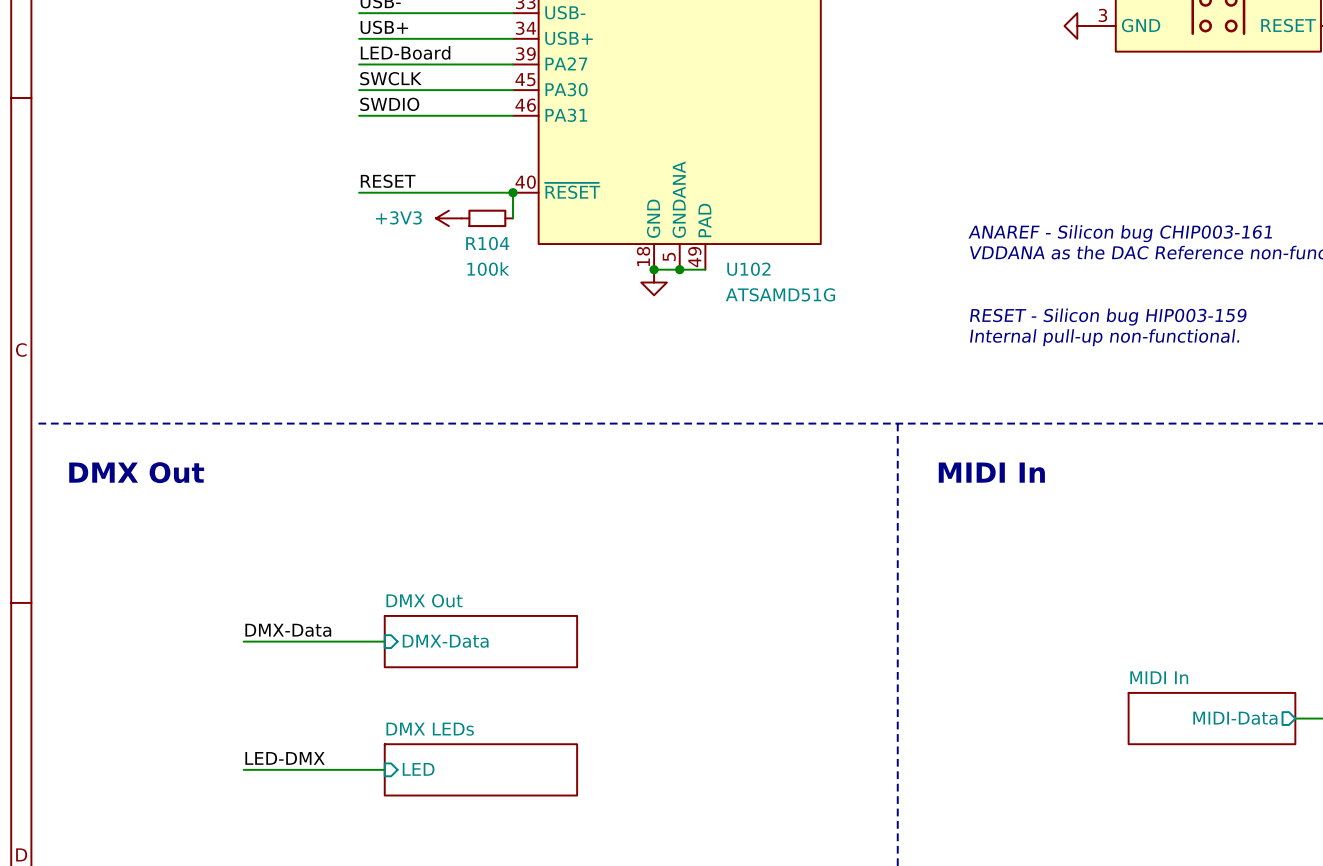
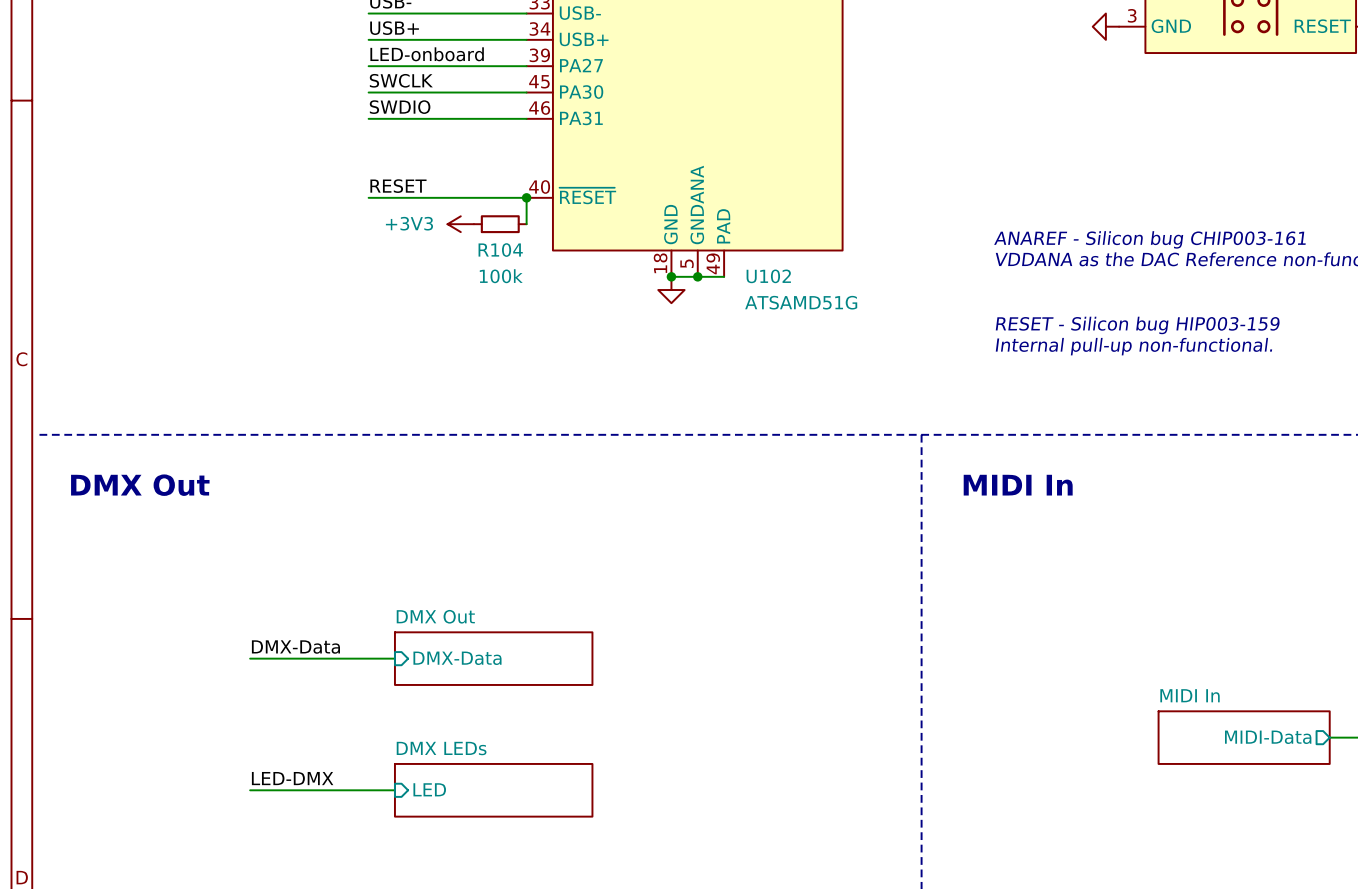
label: LED-Board (405, 52) -> LED-onboard (427, 54)

